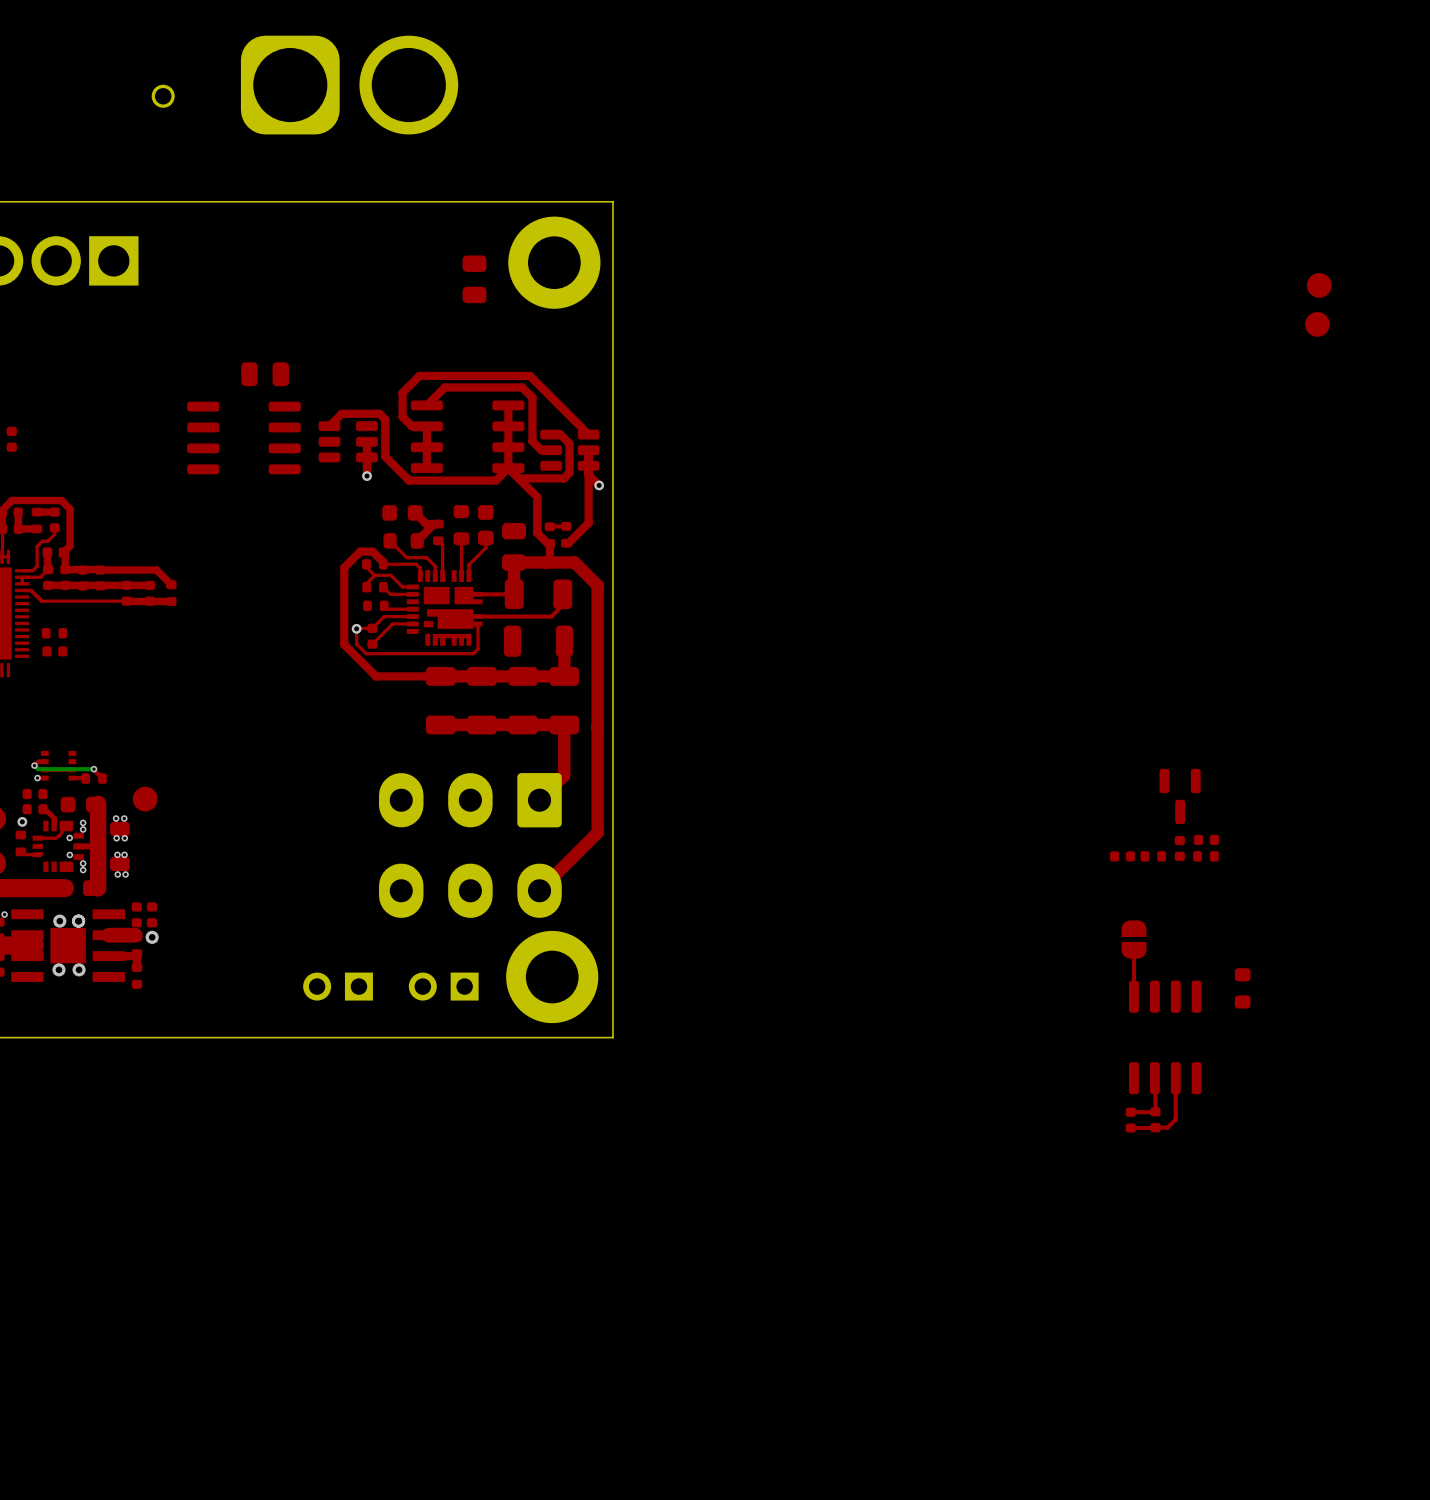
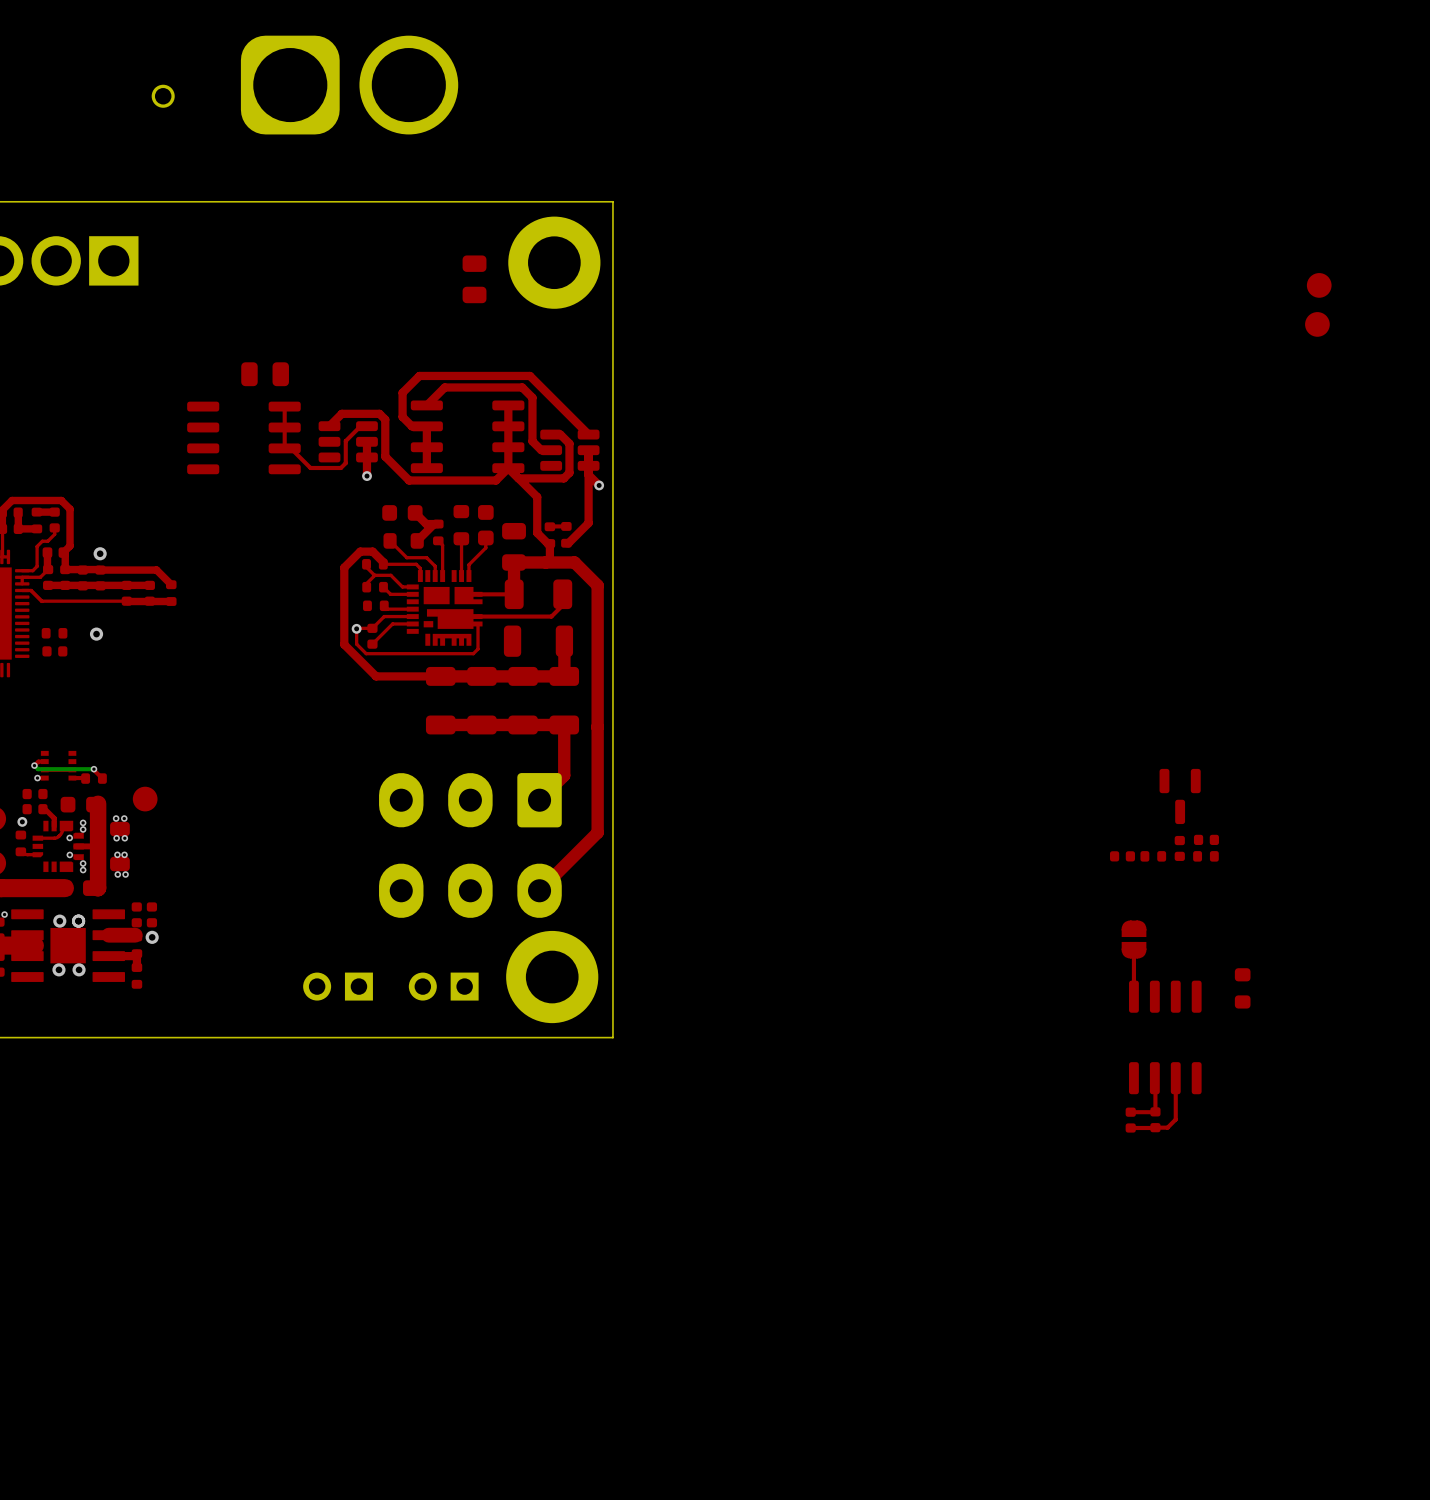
top track: none -> (284, 406) (284, 448) (290, 448) (310, 467) (340, 467) (345, 463) (345, 441) (360, 426) (366, 426)
part: (11, 439) -> none
via: none -> (100, 553)
via: none -> (96, 634)

